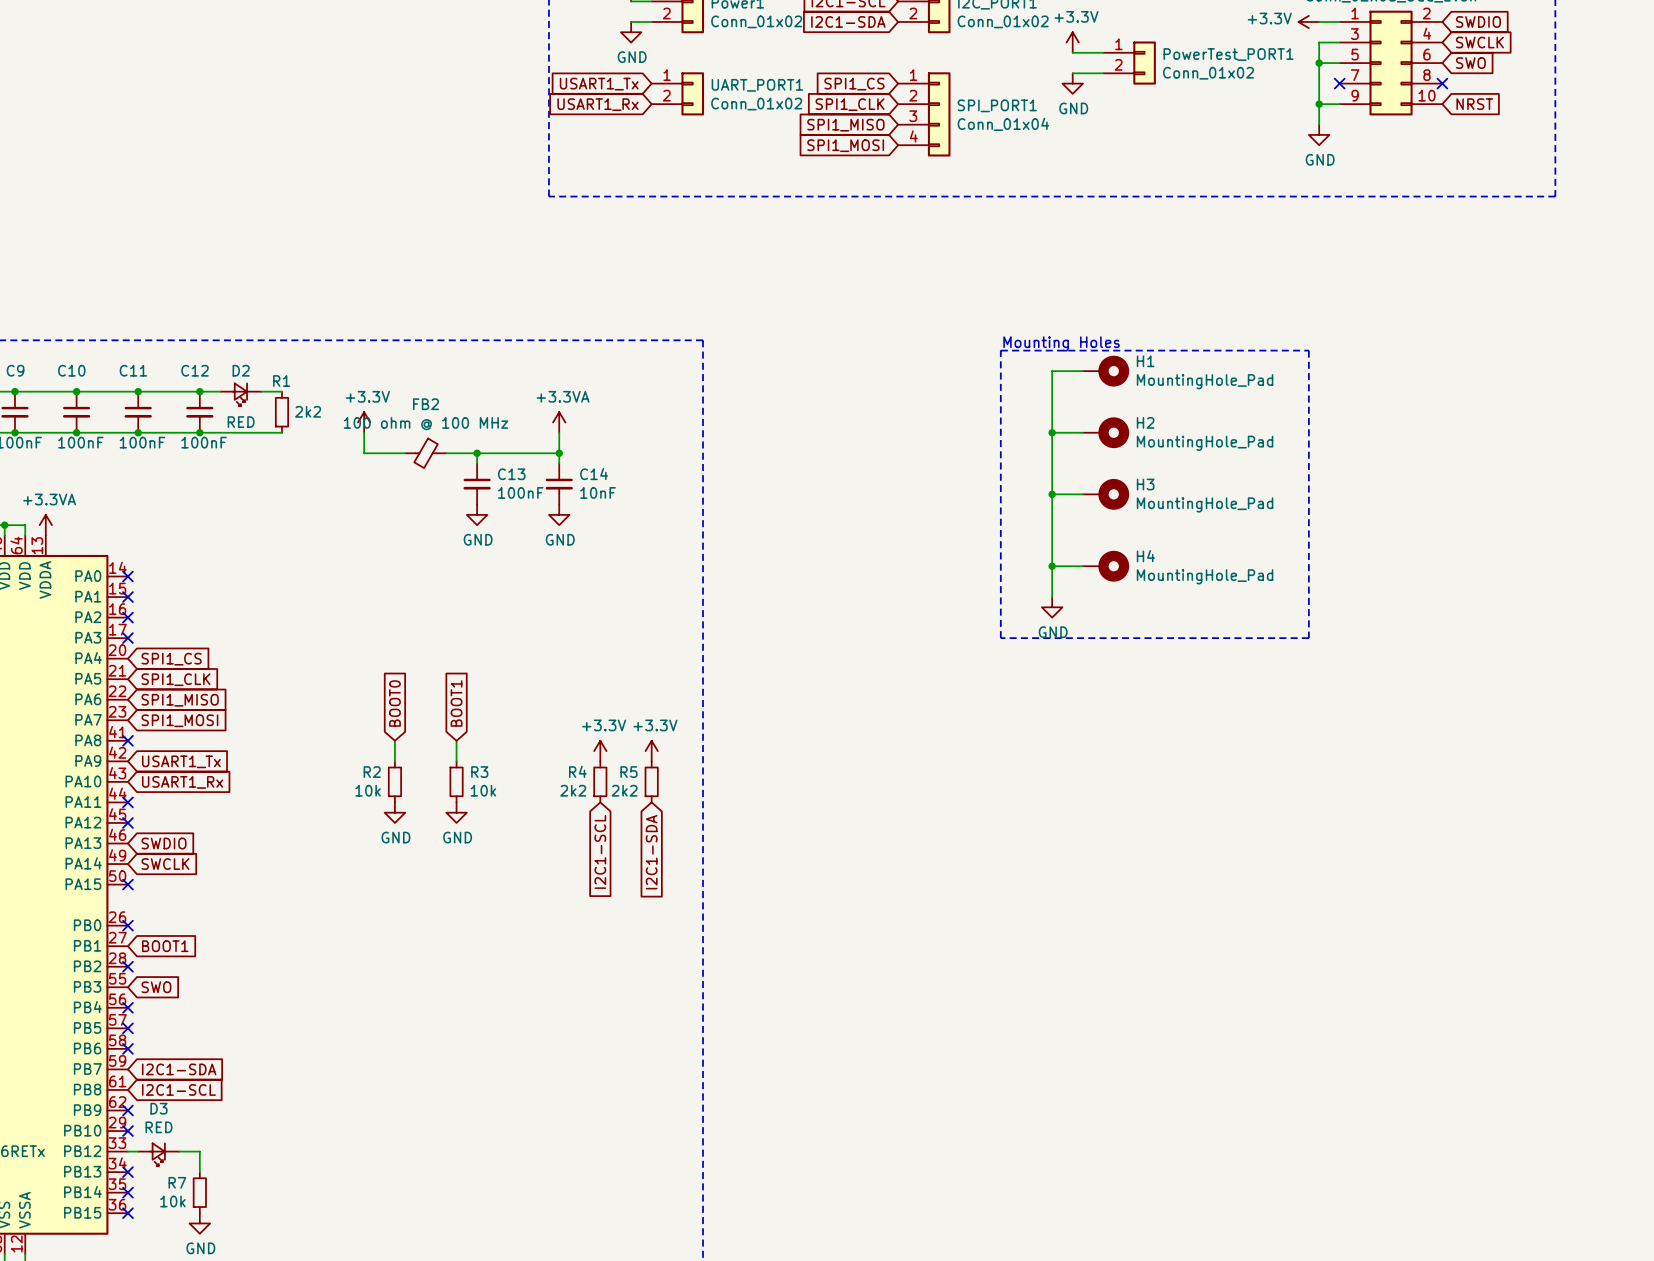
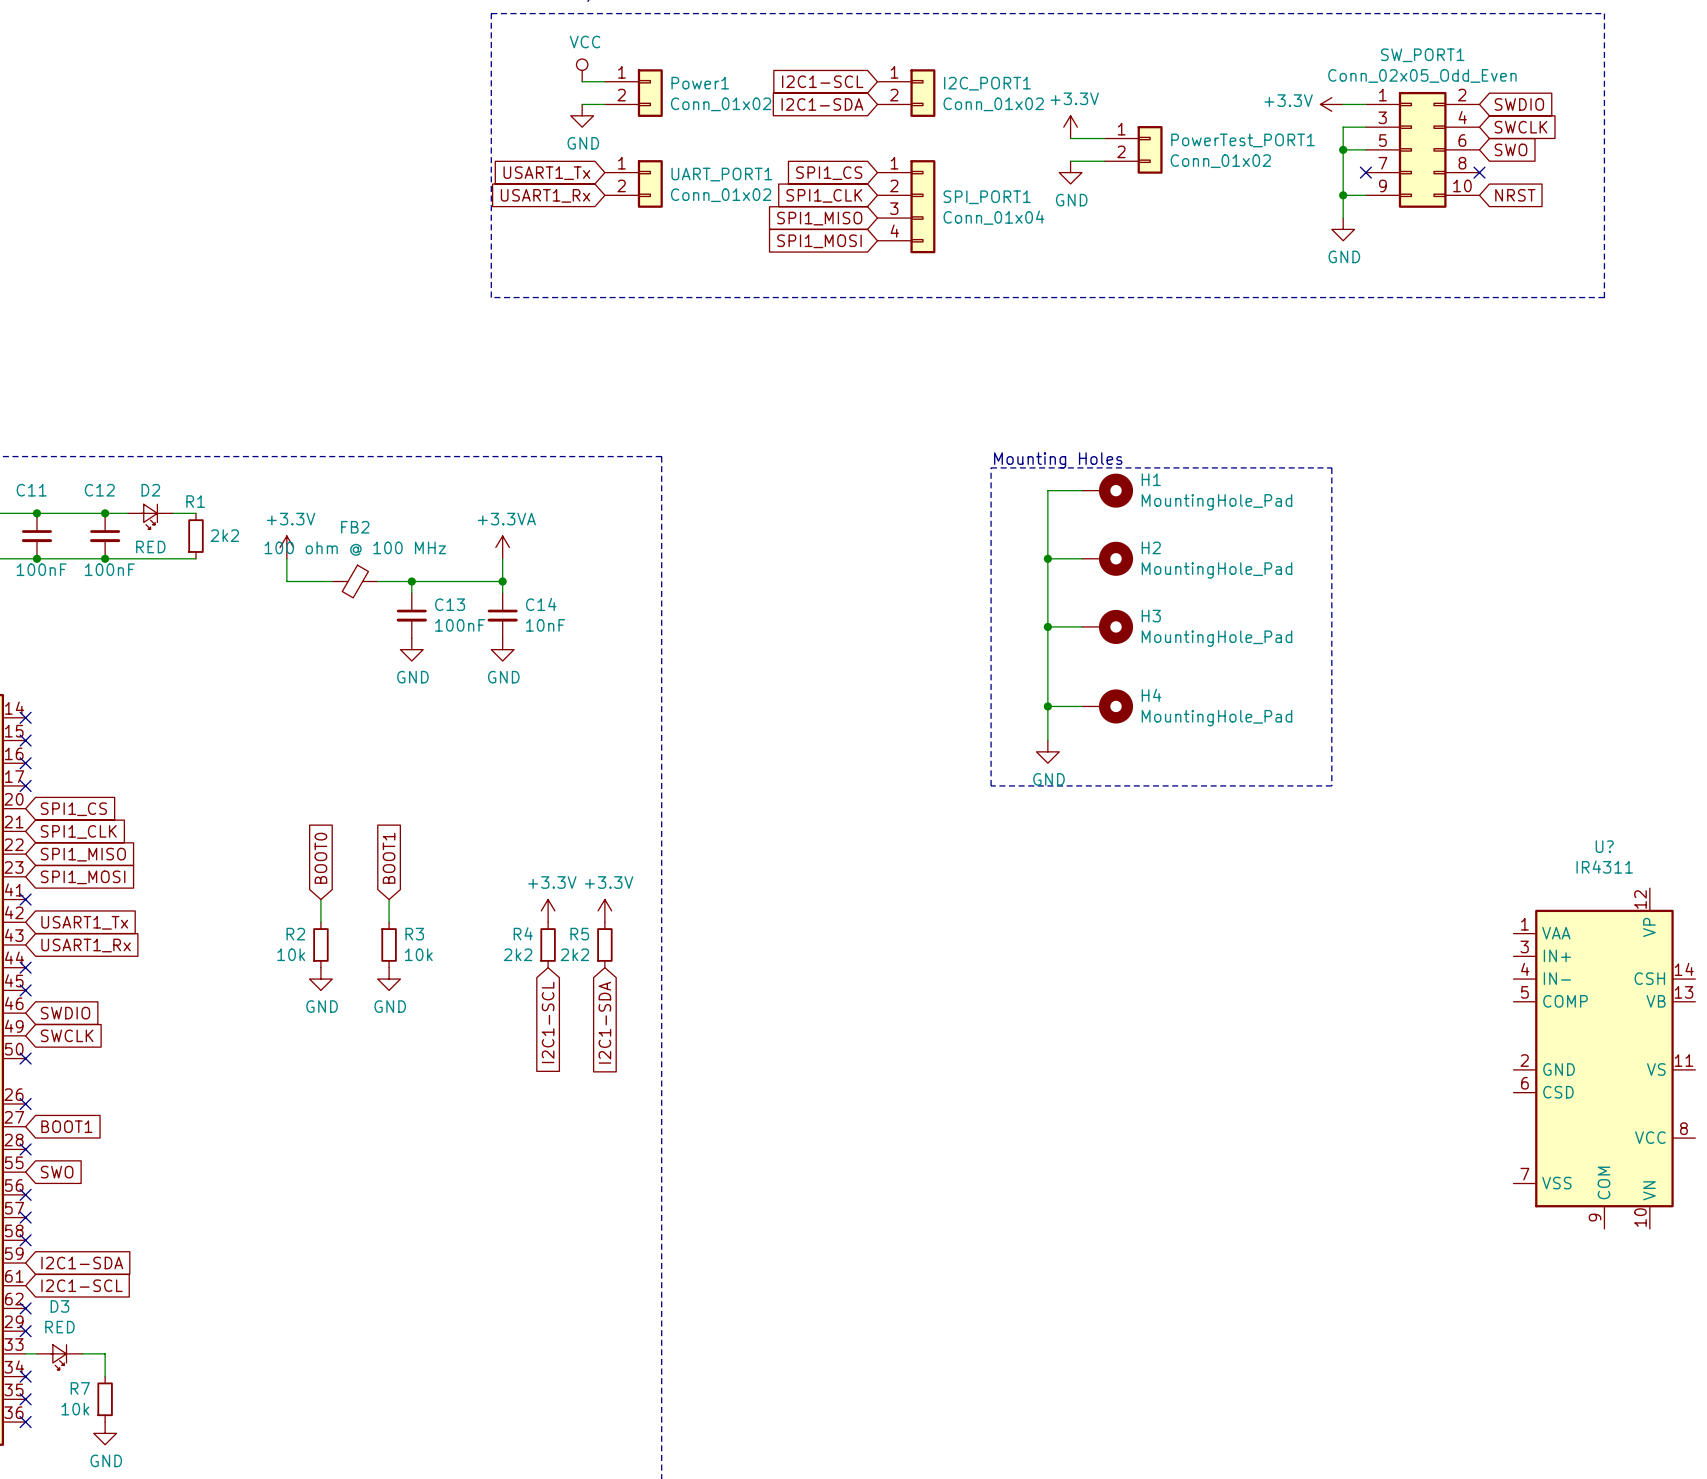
U?: none -> IR4311 (1604, 1058)

